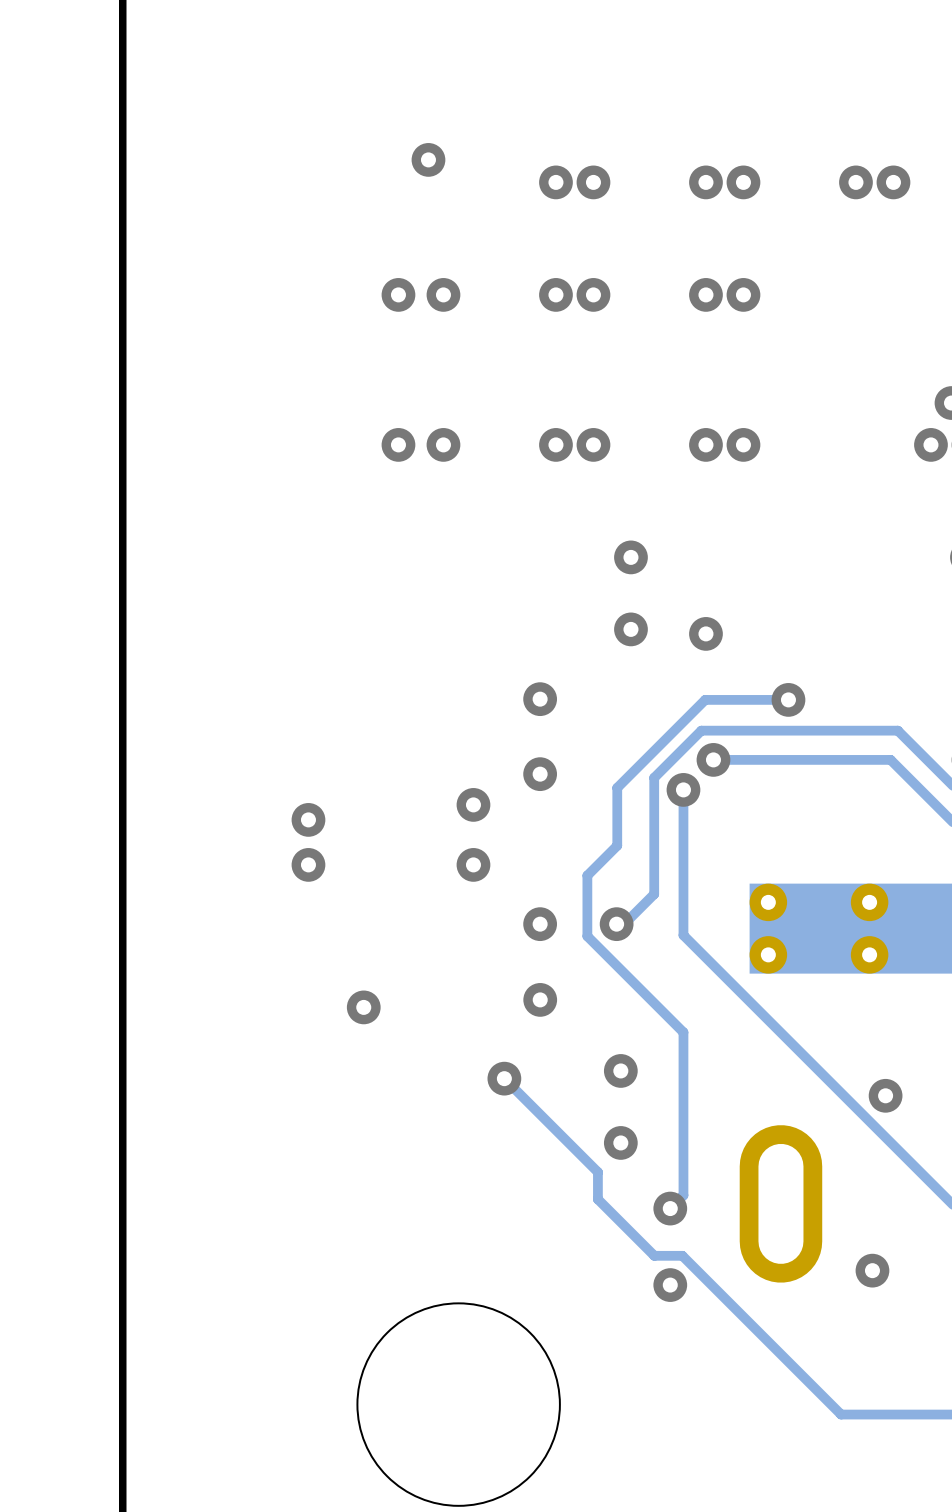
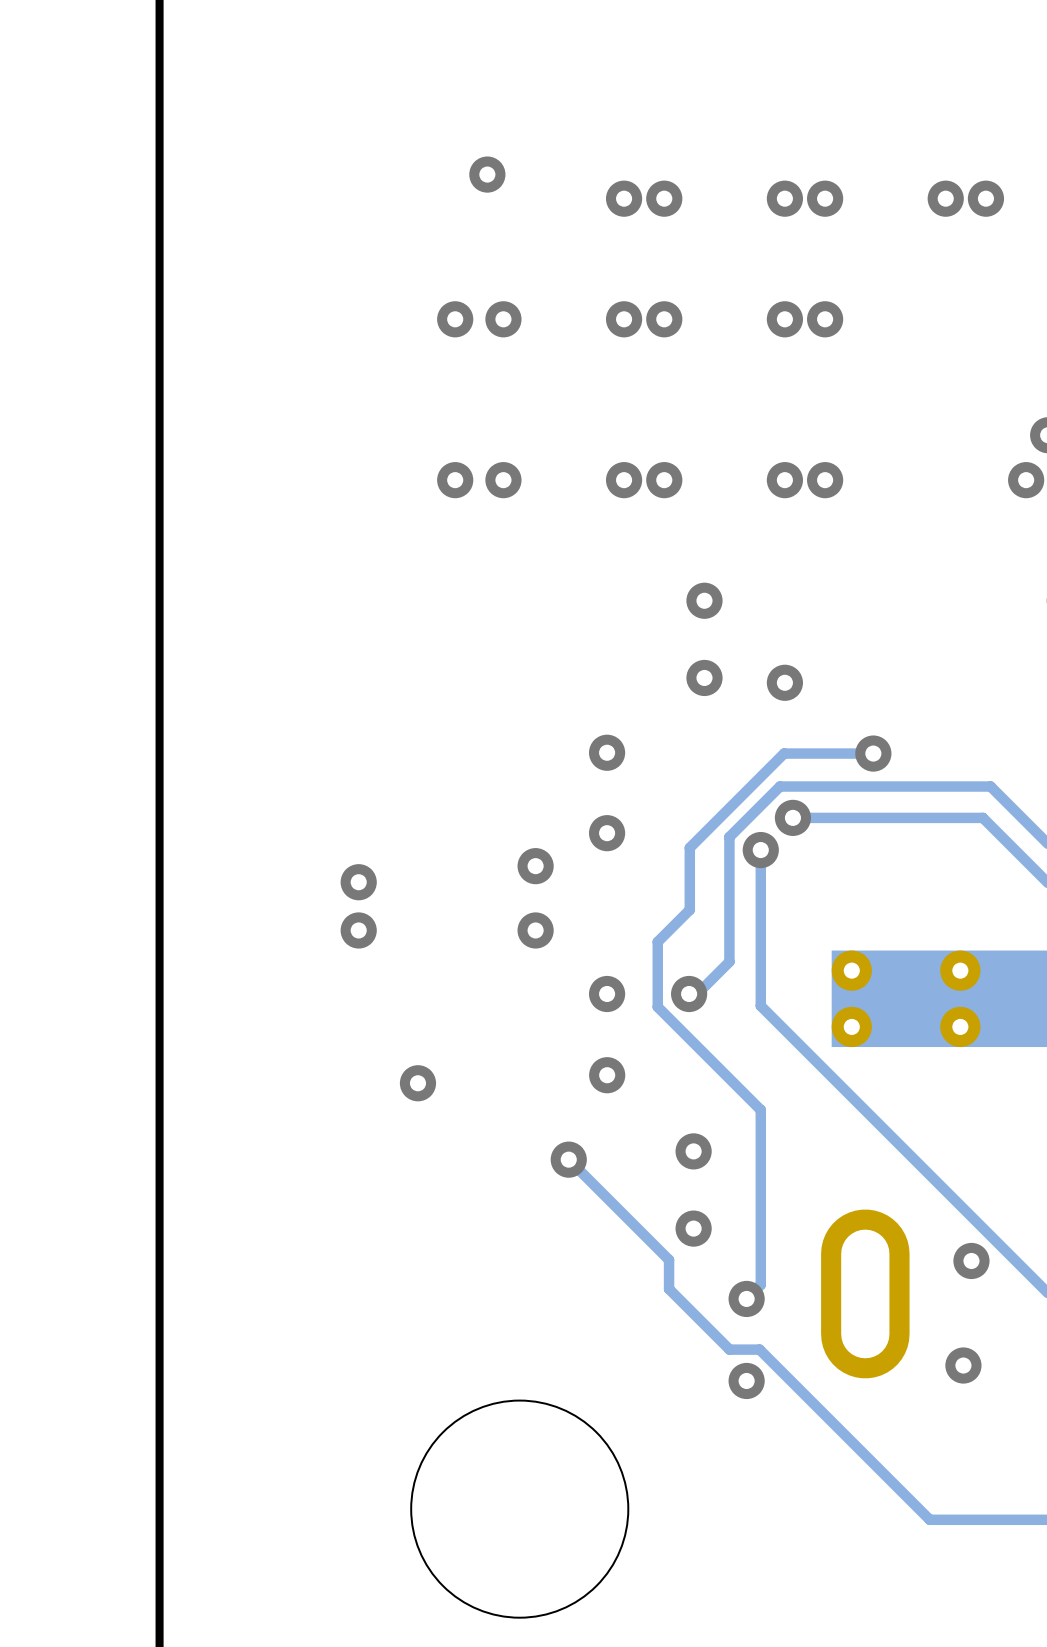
via position: (885, 1095) -> (971, 1260)

